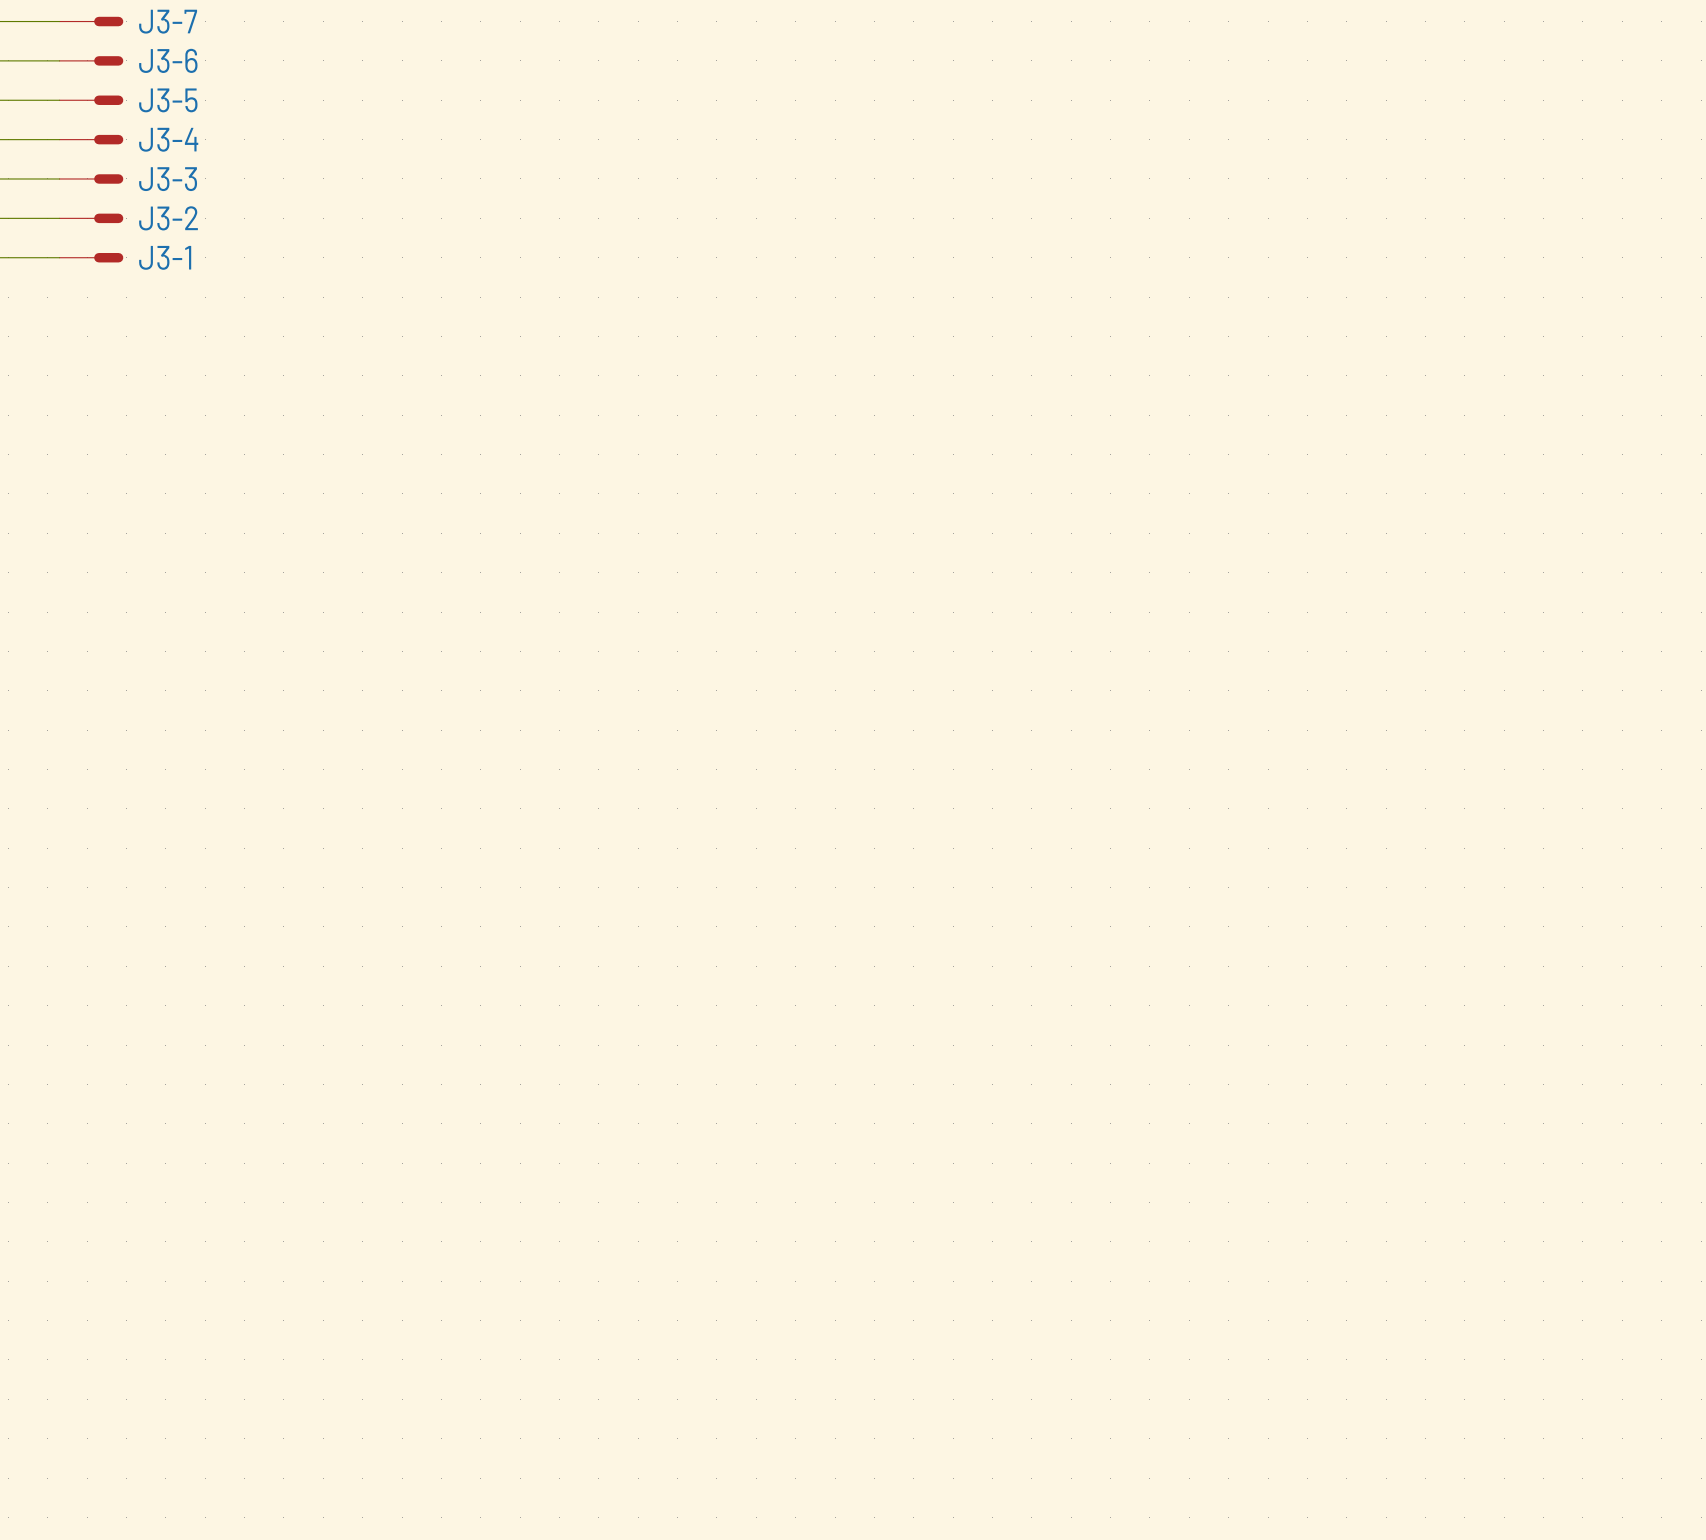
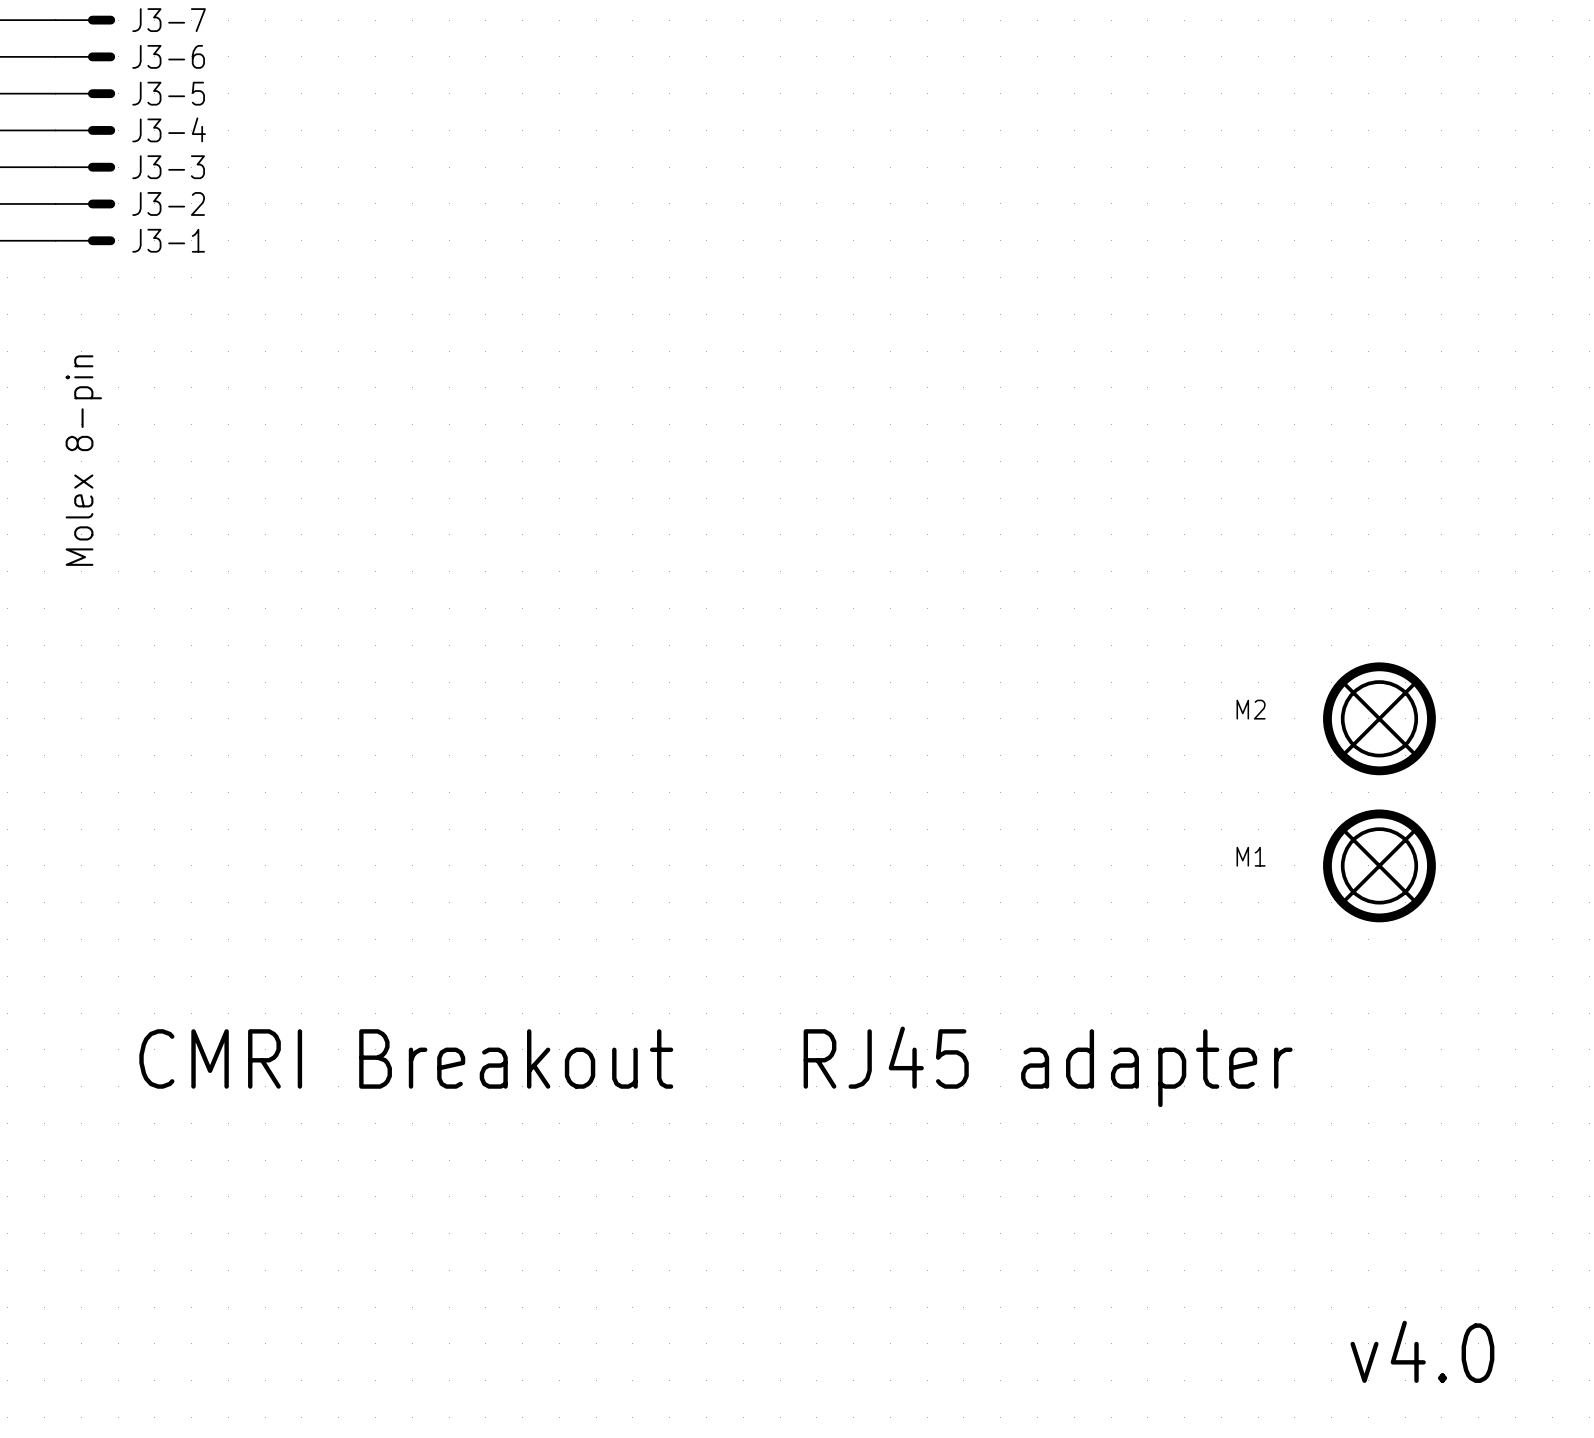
text: none -> Molex 8-pin (83, 460)
M2: none -> (1379, 718)
M1: none -> (1379, 865)
text: none -> CMRI Breakout (406, 1058)
text: none -> RJ45 adapter (1048, 1066)
text: none -> v4.0 (1422, 1351)

